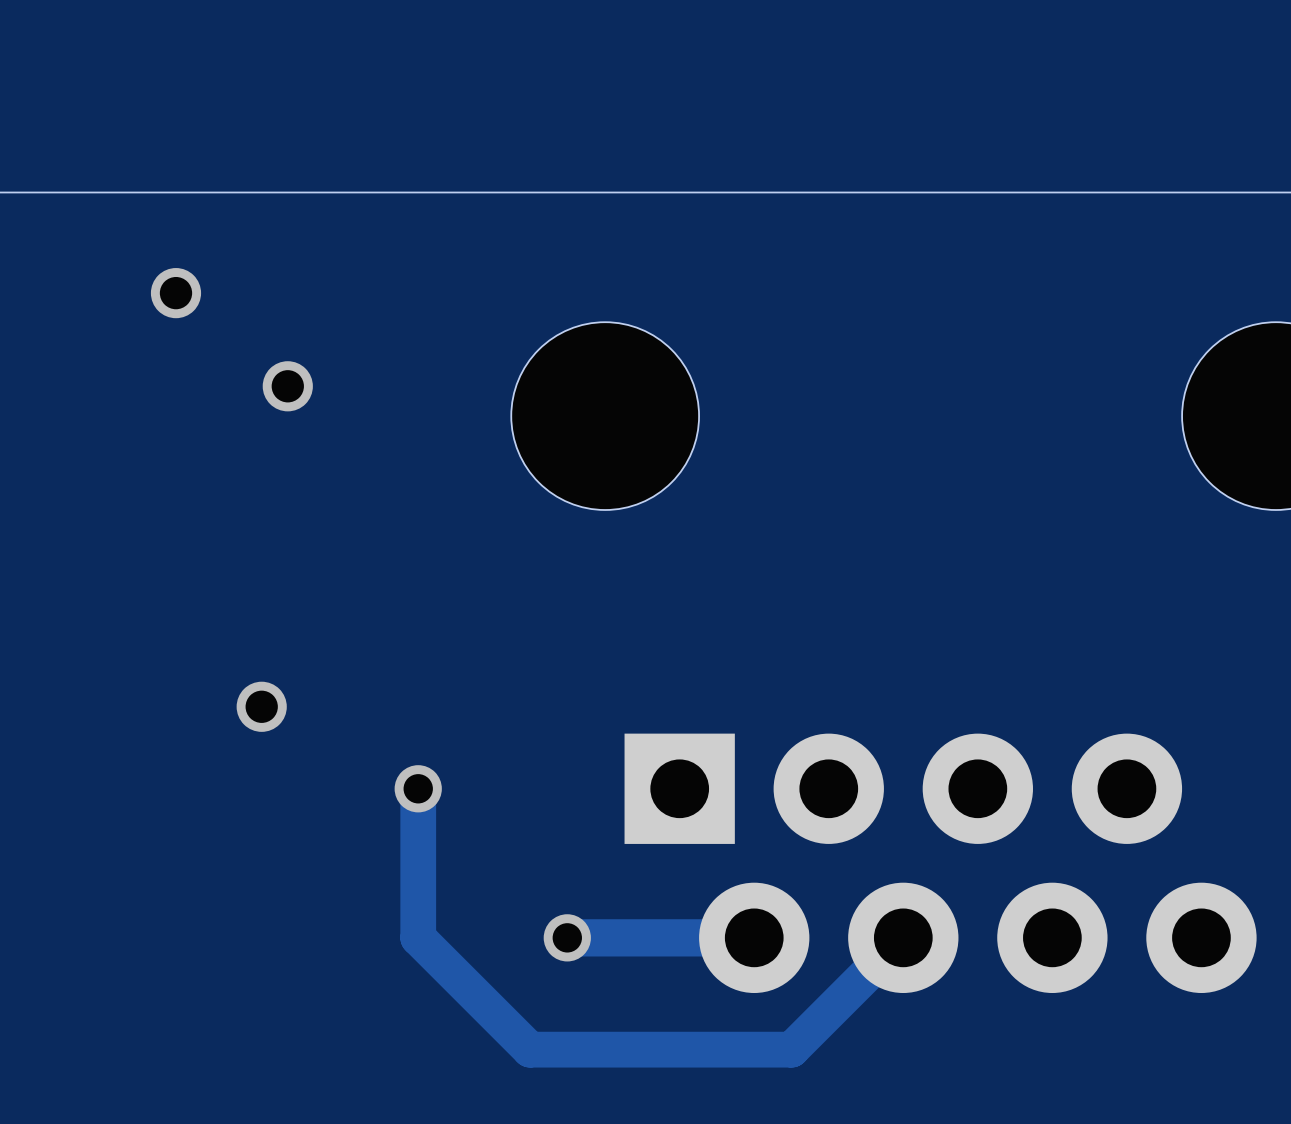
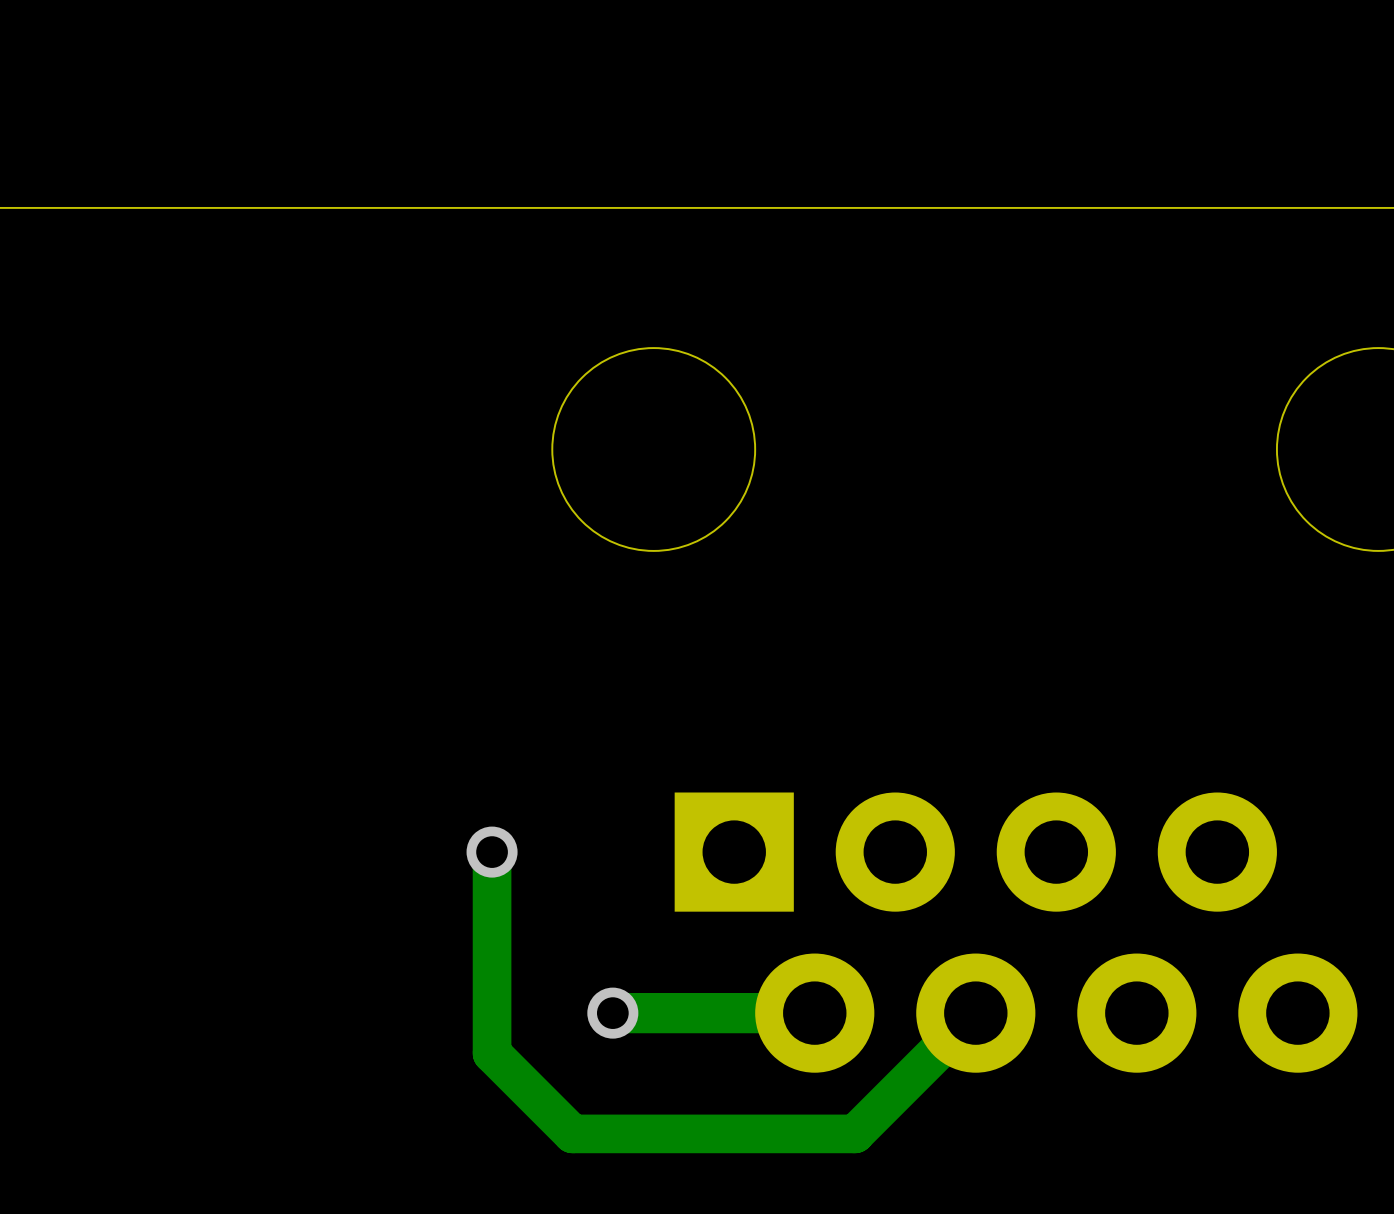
via: (175, 293) -> none
via: (287, 386) -> none
via: (261, 706) -> none
track: (418, 788) (418, 937) (455, 975) -> (492, 852) (492, 1053)
via position: (418, 788) -> (492, 852)

